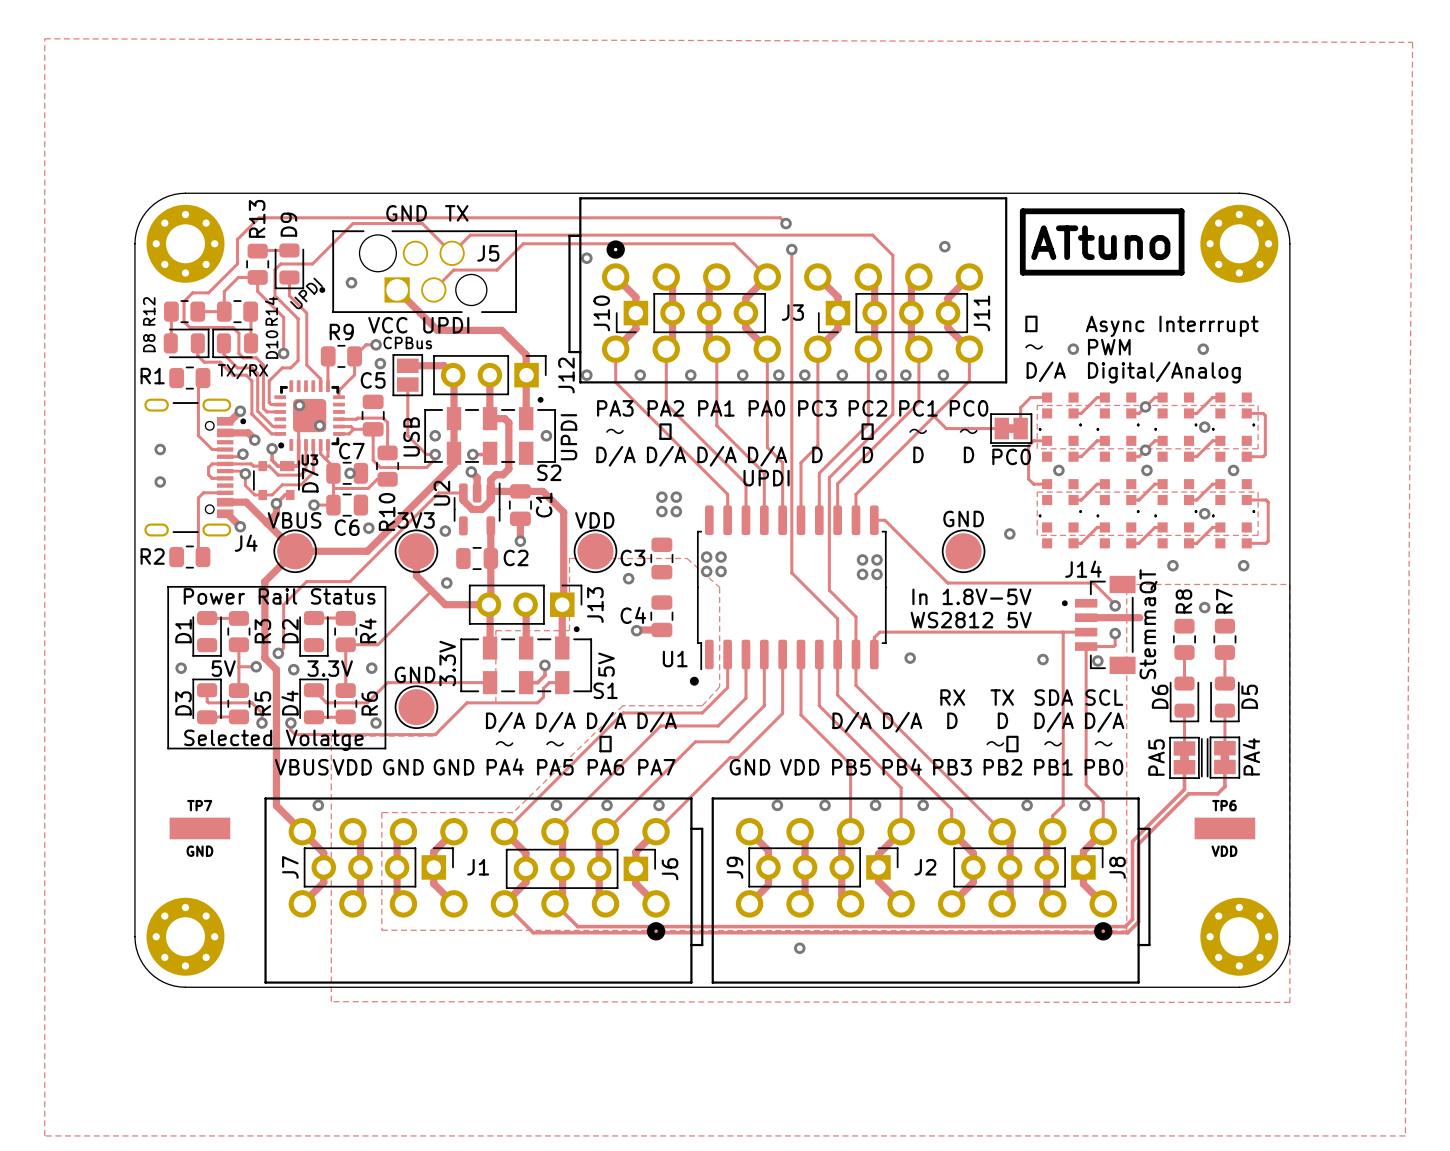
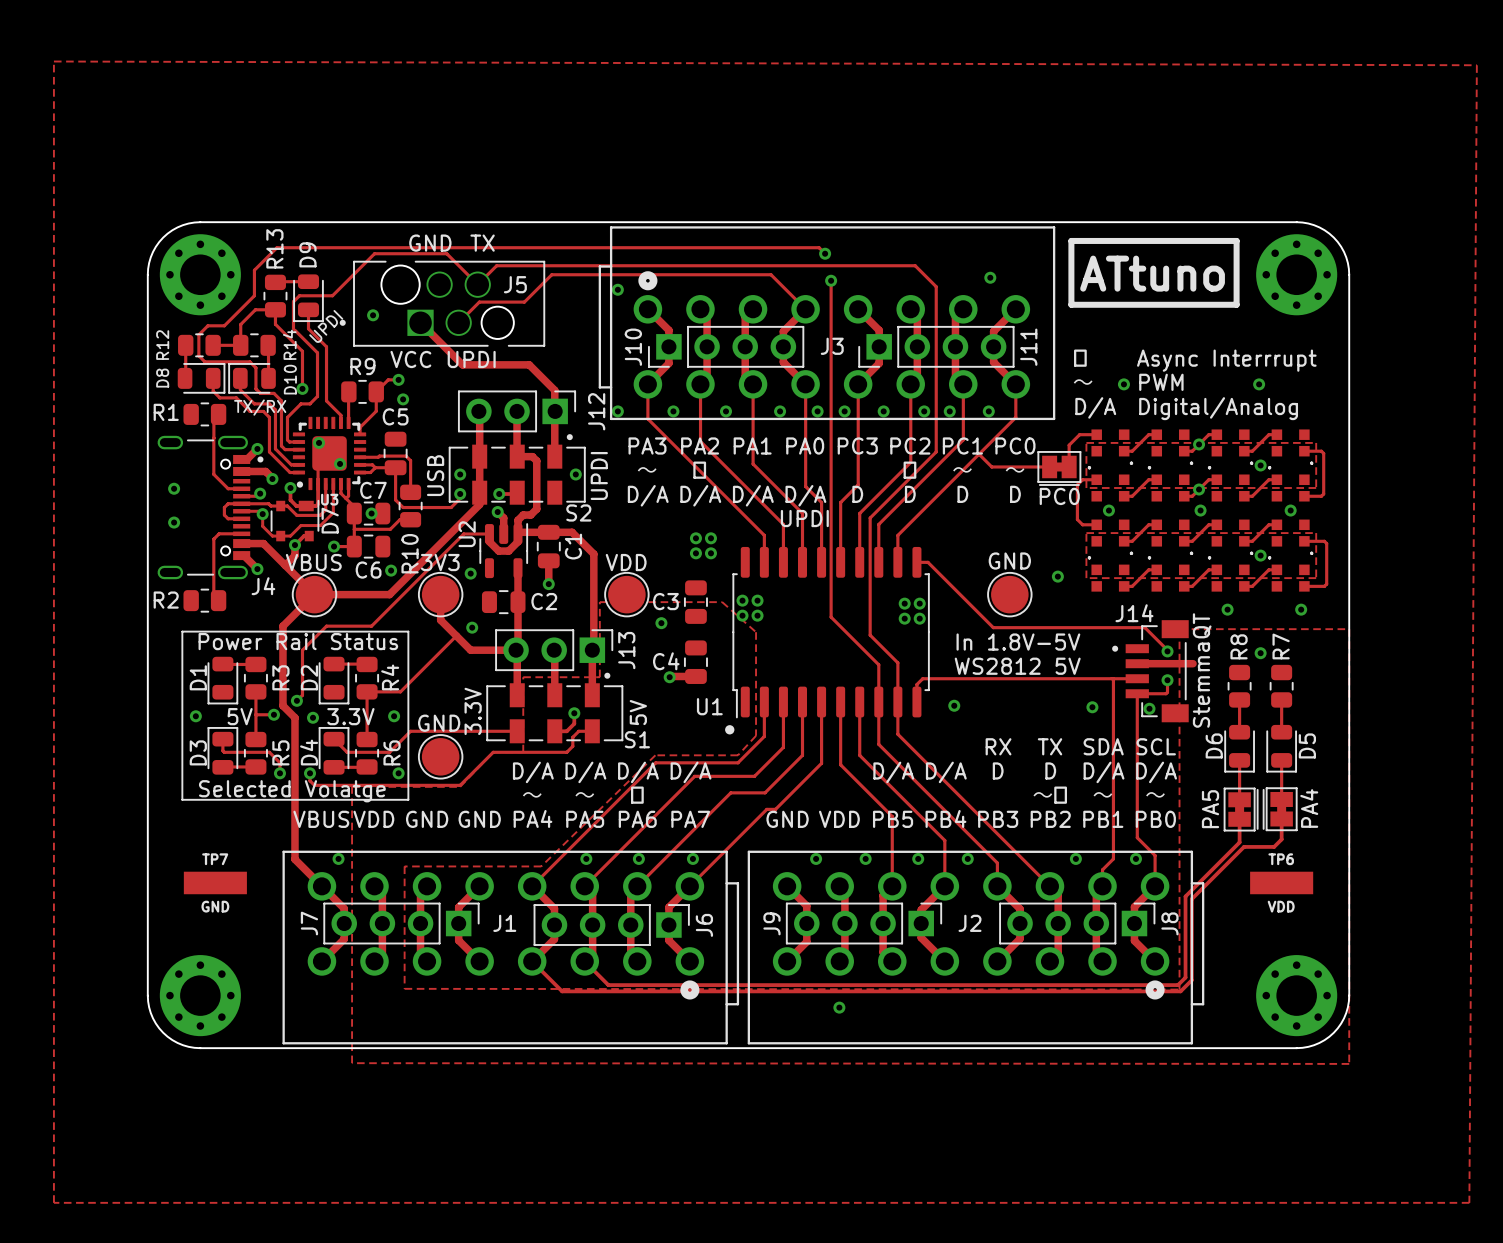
track: (407, 365) (443, 365) (453, 375) -> none
part: CPBus (407, 375) -> none
track: (407, 384) (407, 435) (426, 454) (435, 454) -> none

